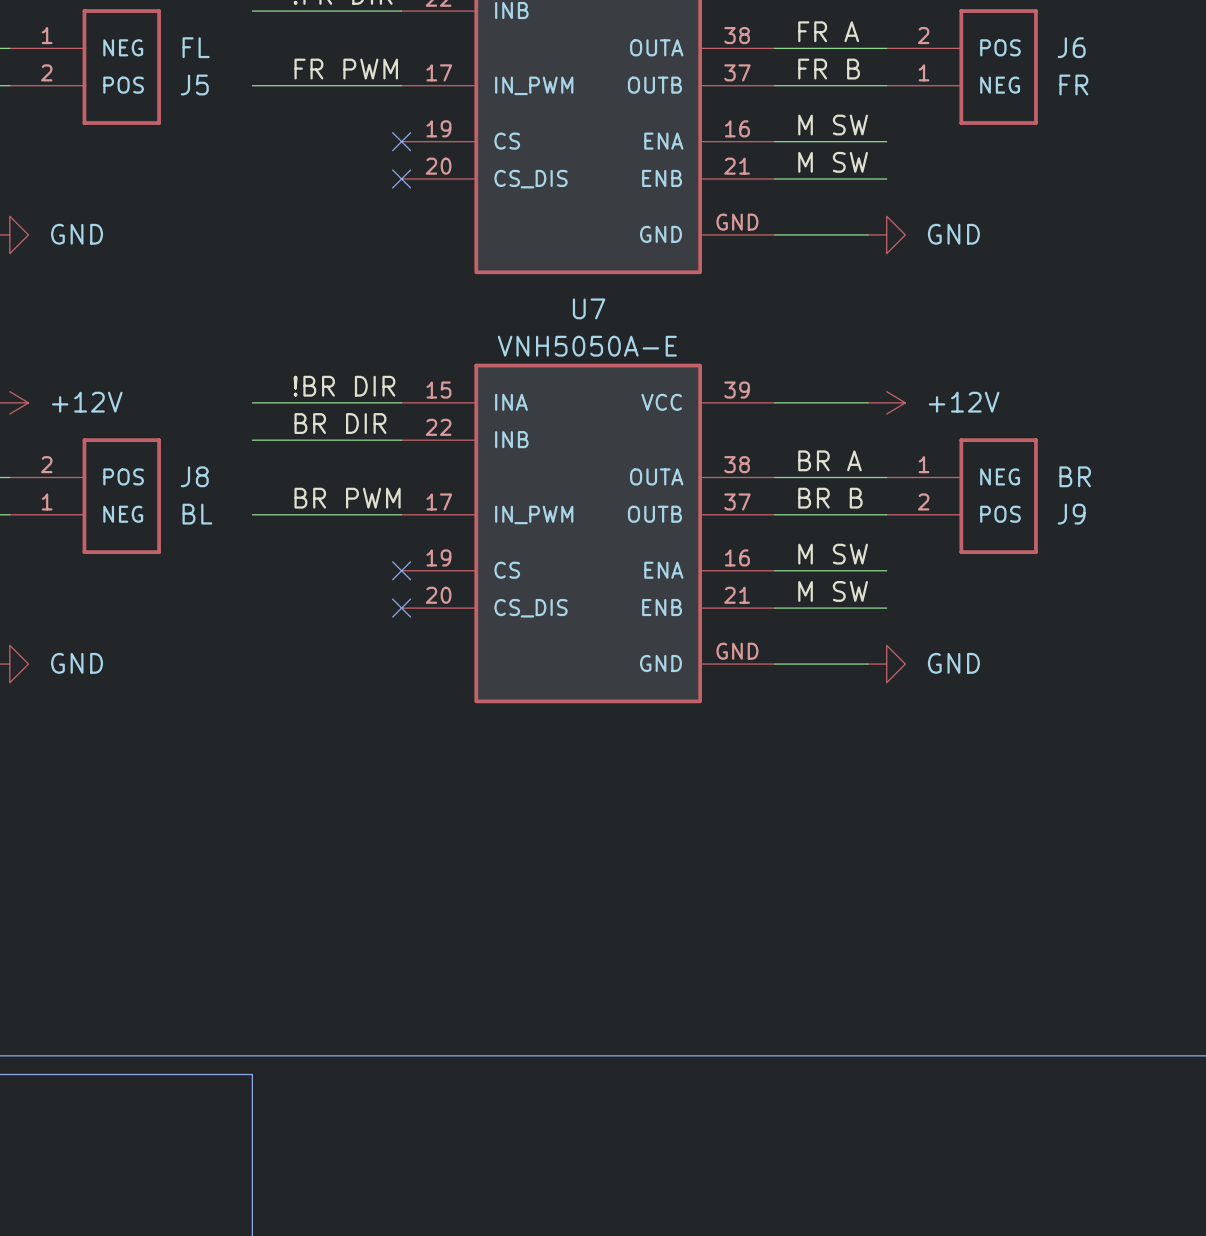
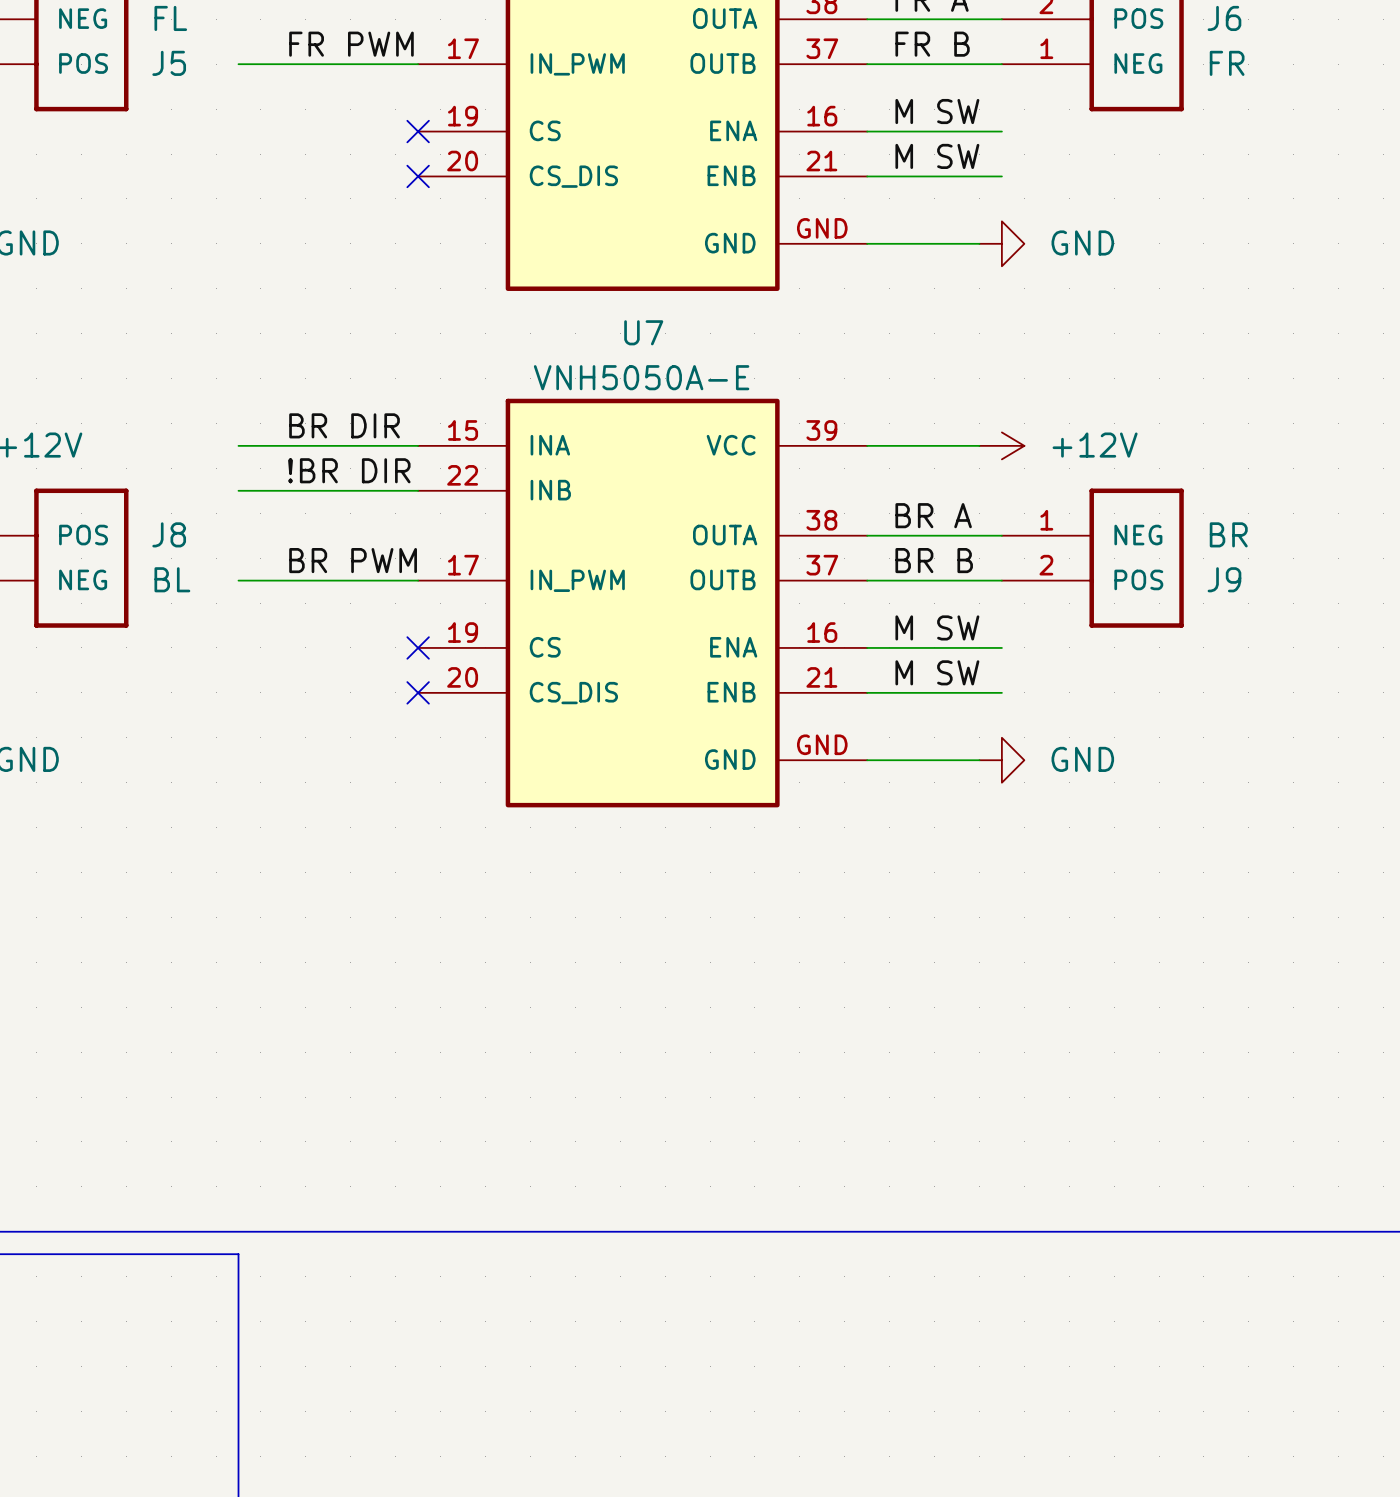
label: !BR DIR (344, 386) -> BR DIR (344, 425)
label: BR DIR (340, 423) -> !BR DIR (349, 470)

